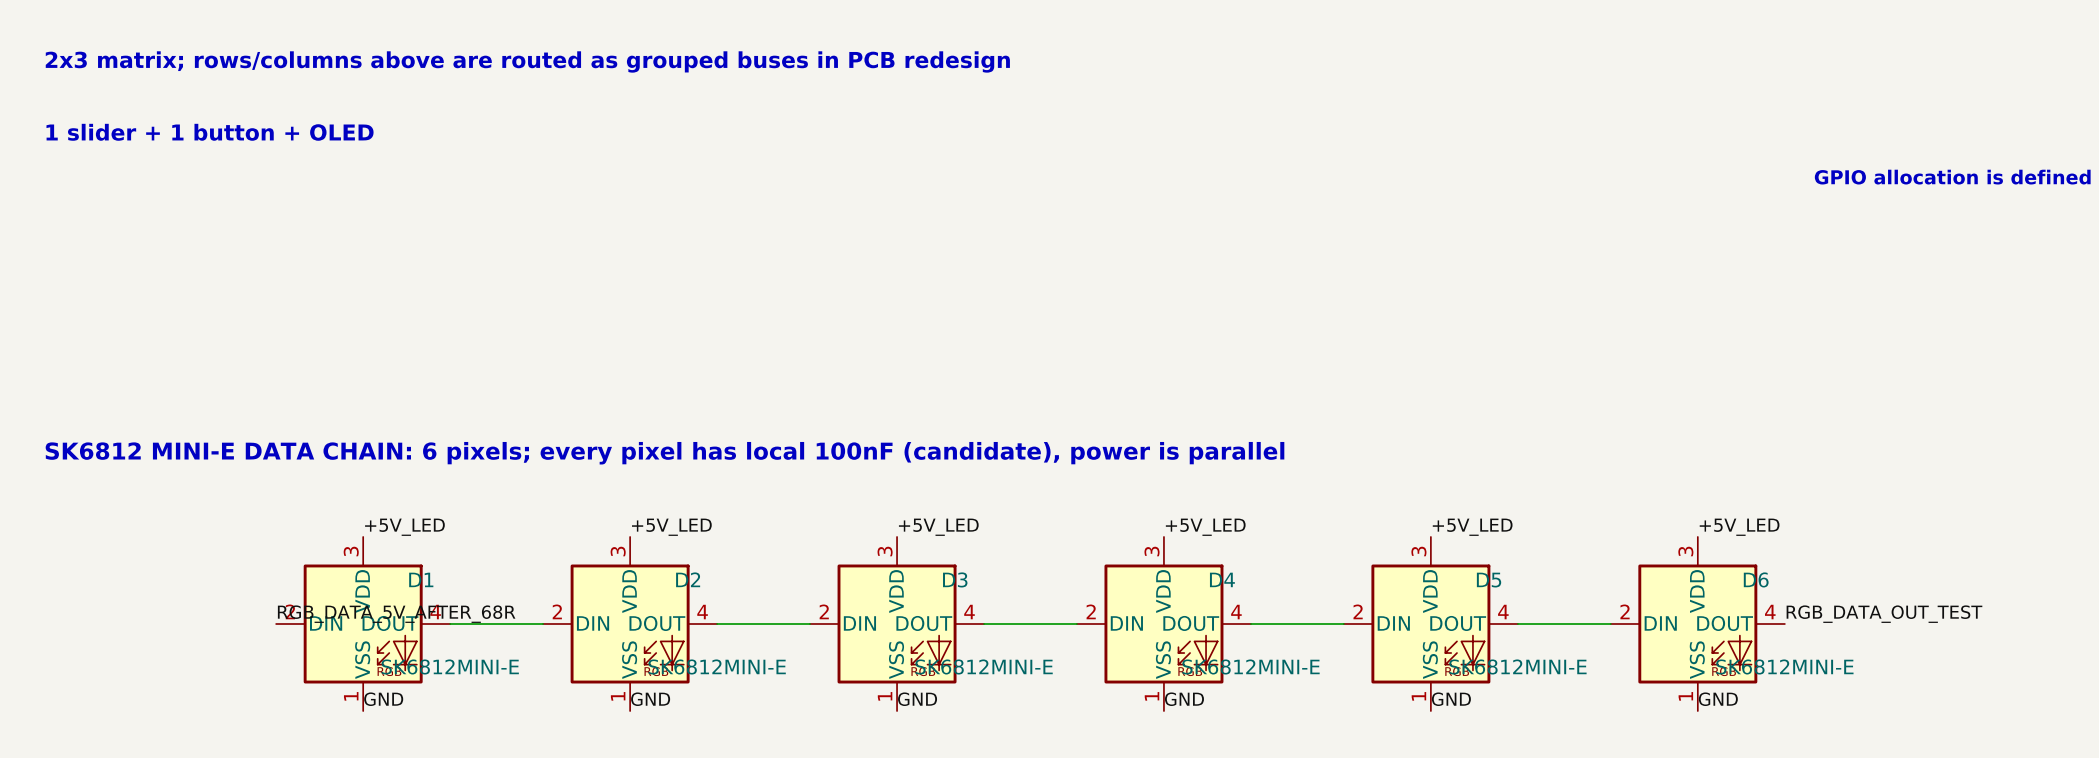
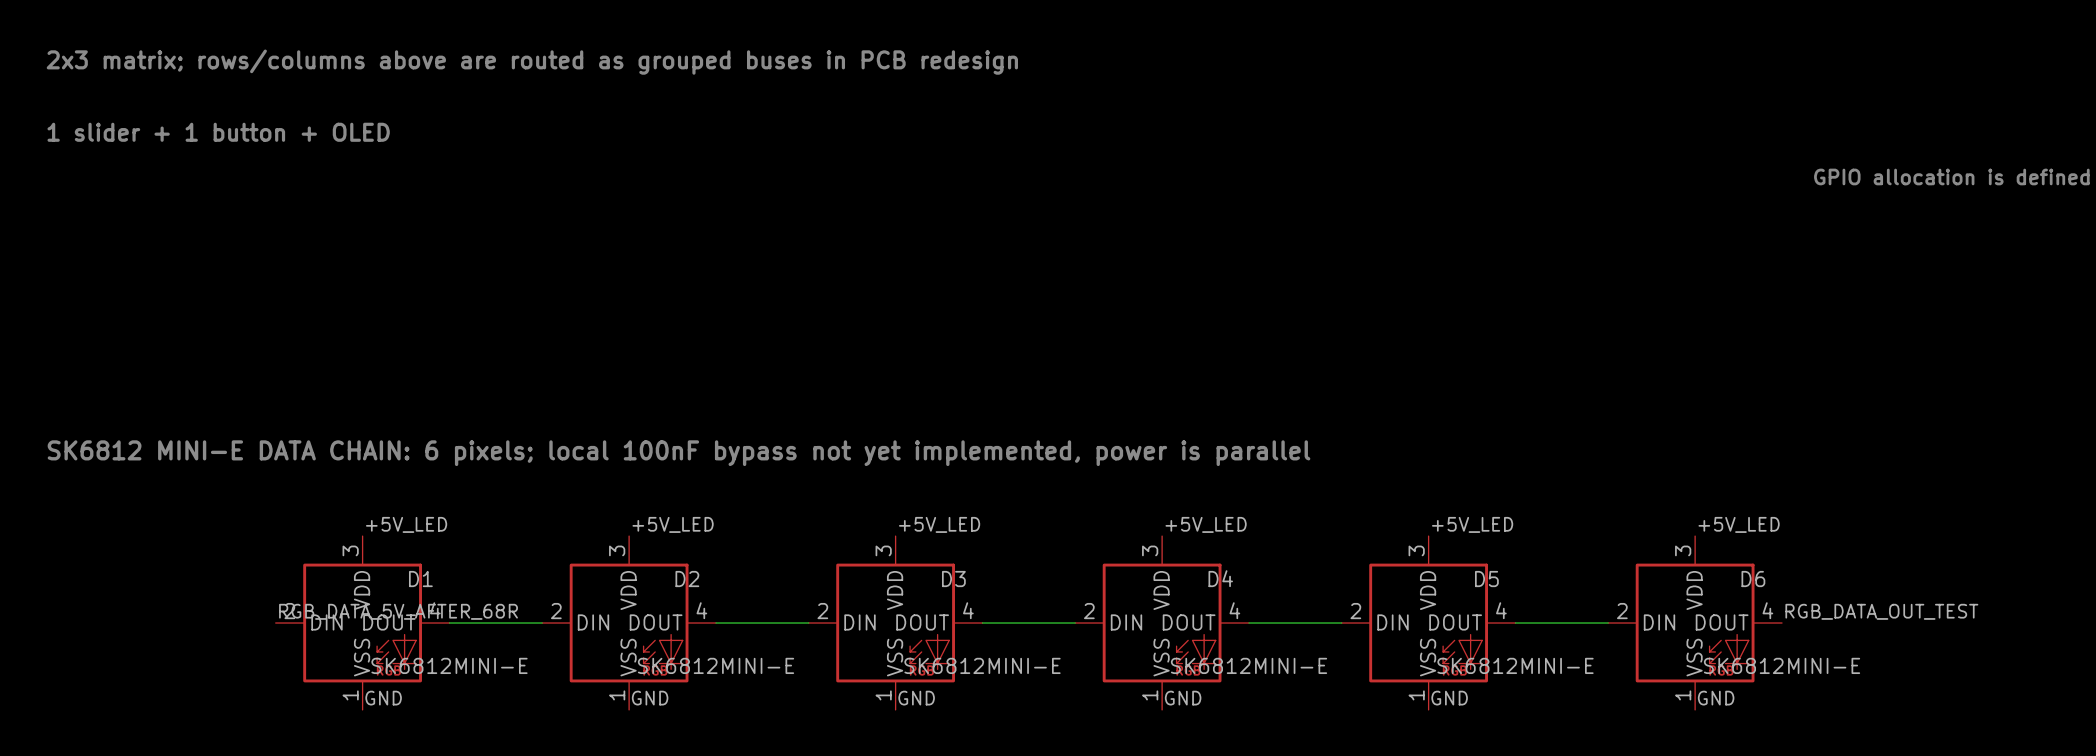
text: SK6812 MINI-E DATA CHAIN: 6 pixels; every pixel has local 100nF (candidate), power is parallel (664, 453) -> SK6812 MINI-E DATA CHAIN: 6 pixels; local 100nF bypass not yet implemented, power is parallel (679, 453)

